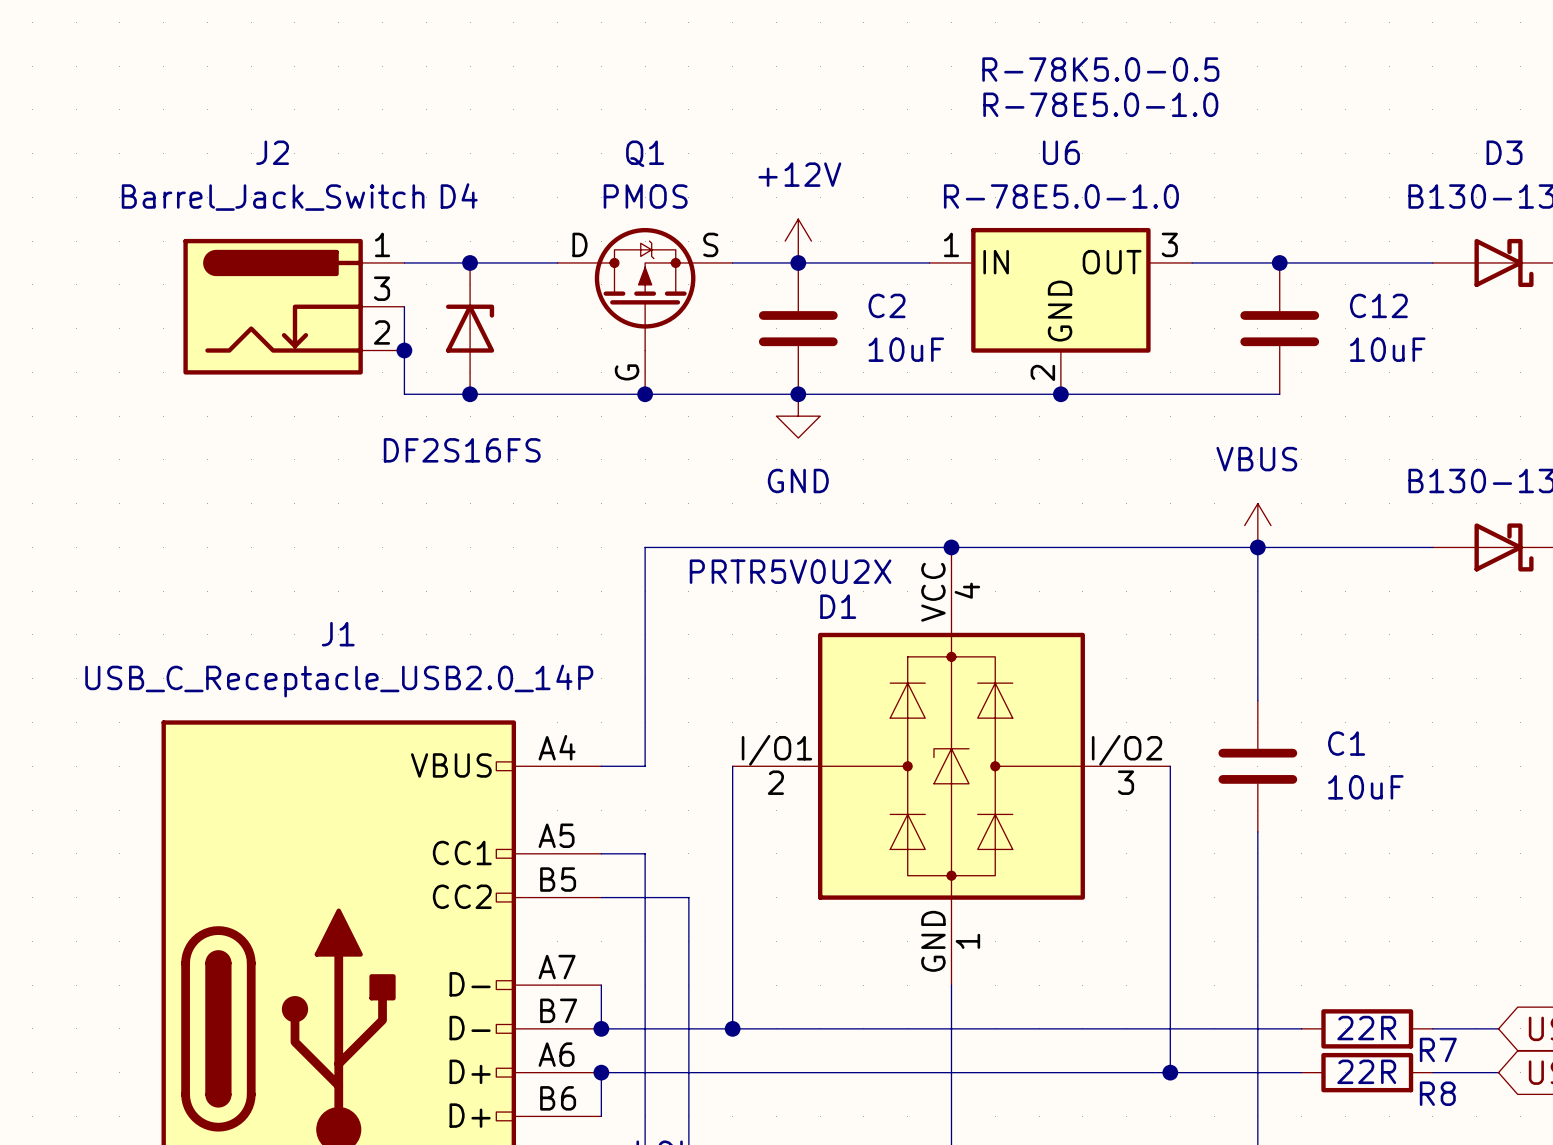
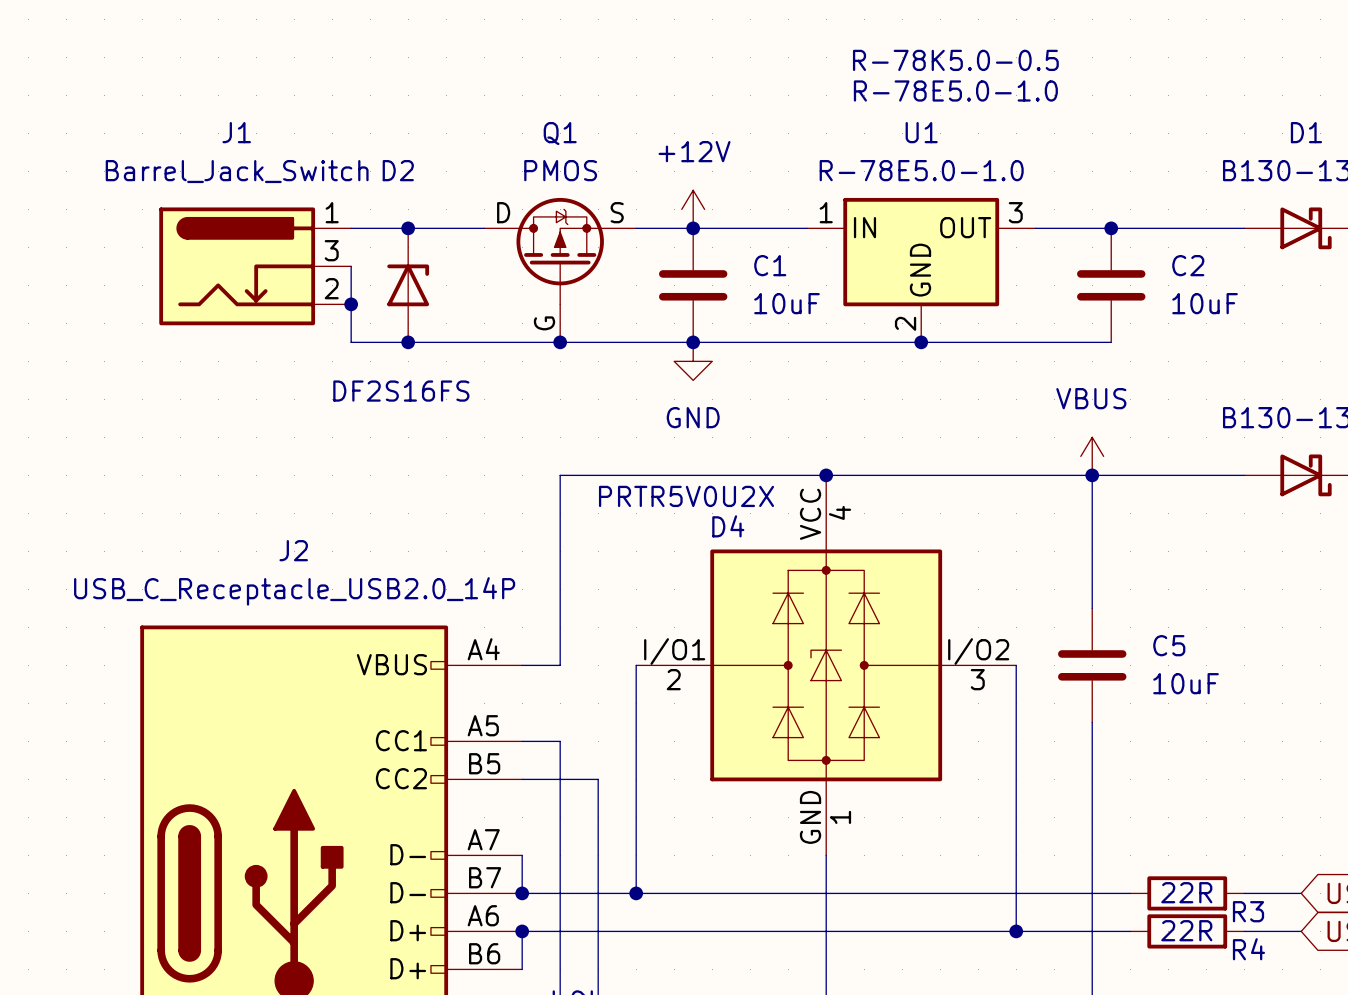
J2 name: J2 (272, 152) -> J1 (236, 132)
U6 name: U6 (1061, 152) -> U1 (921, 132)
D3 name: D3 (1504, 152) -> D1 (1306, 132)
D4 name: D4 (459, 195) -> D2 (398, 170)
C2 name: C2 (887, 305) -> C1 (770, 265)
C12 name: C12 (1378, 305) -> C2 (1188, 265)
D1 name: D1 (838, 606) -> D4 (728, 526)
J1 name: J1 (338, 634) -> J2 (293, 550)
C1 name: C1 (1346, 743) -> C5 (1169, 645)
R7 name: R7 (1438, 1049) -> R3 (1248, 911)
R8 name: R8 (1437, 1093) -> R4 (1248, 949)

